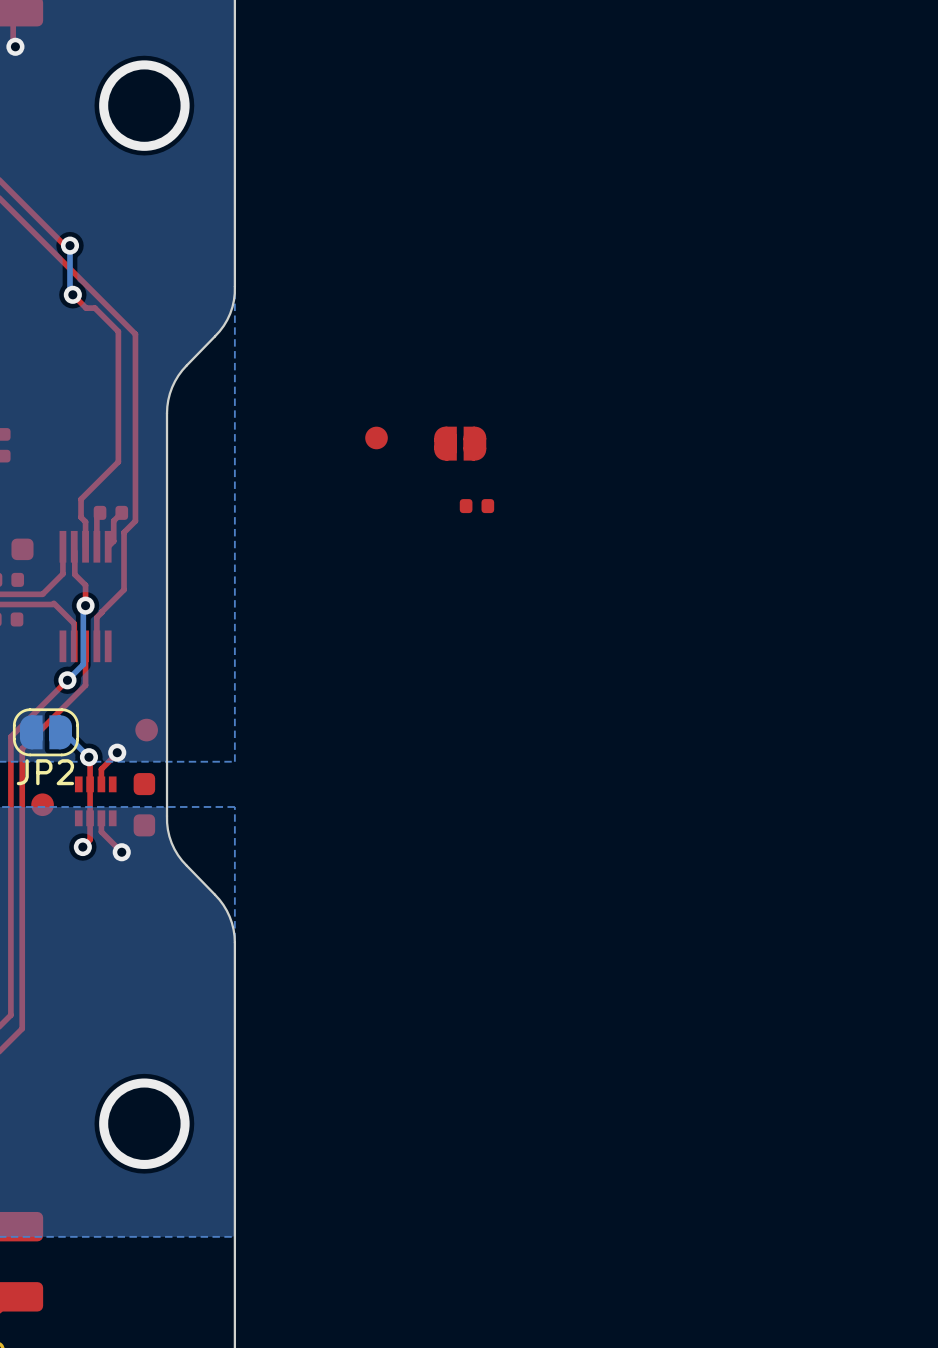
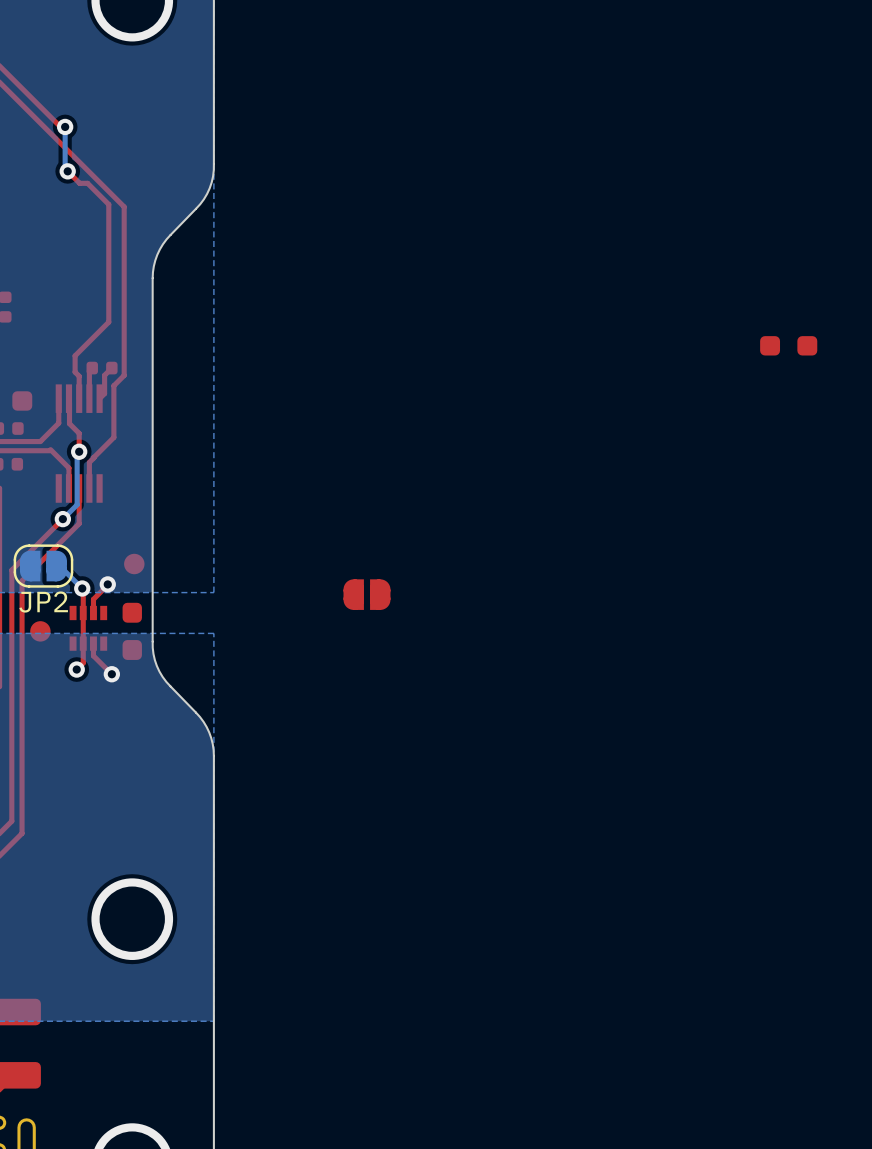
part: (376, 437) -> none
part position: (460, 443) -> (366, 594)
part: none -> (788, 345)
part: (476, 506) -> none

